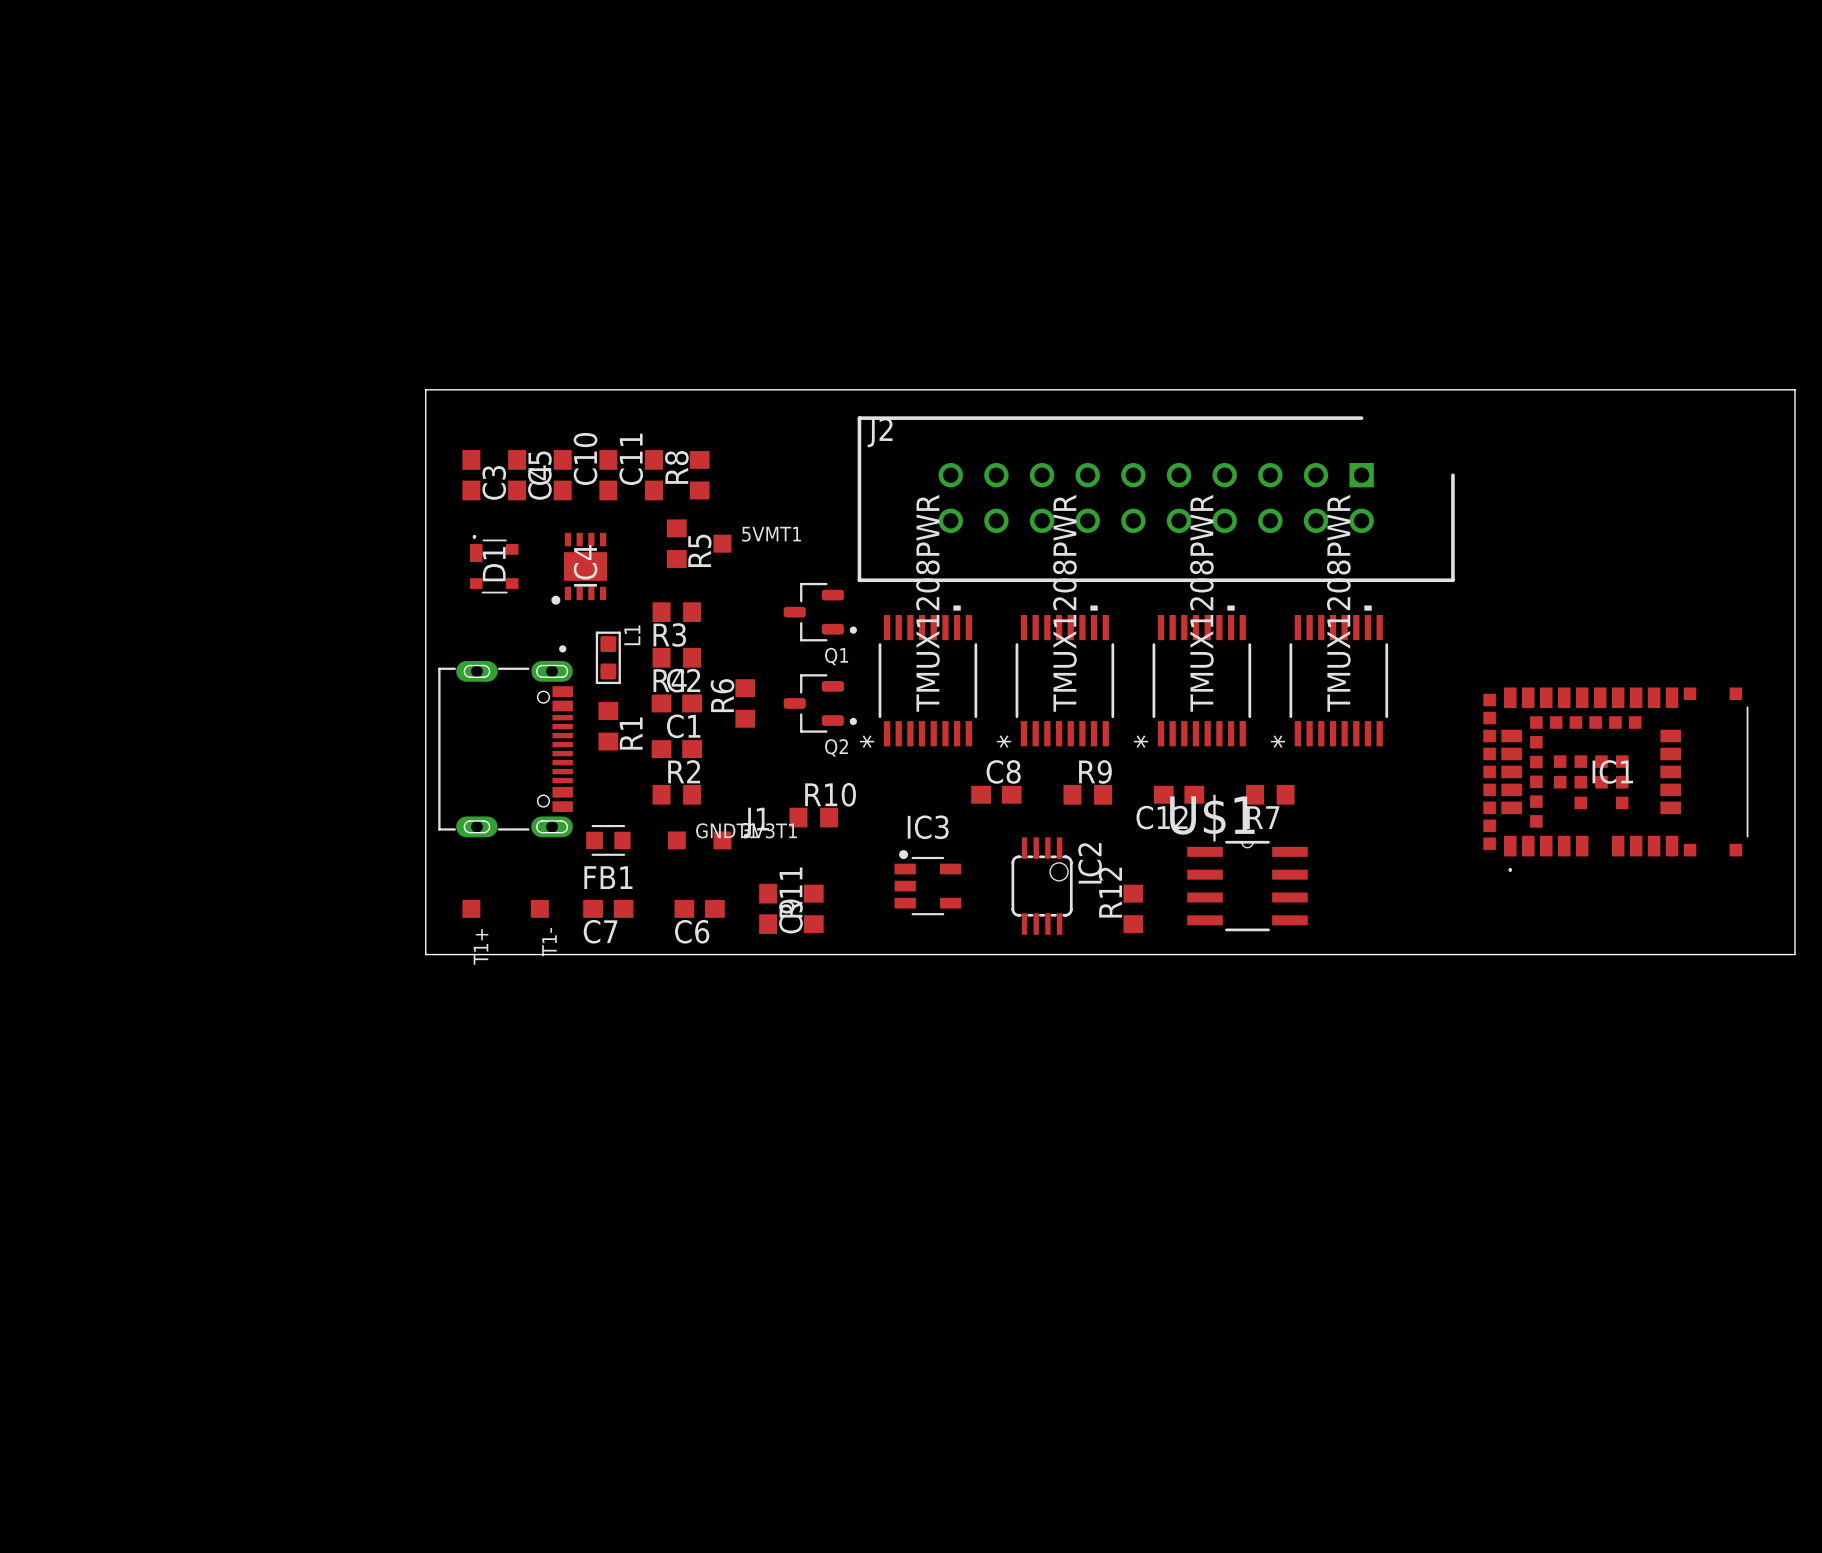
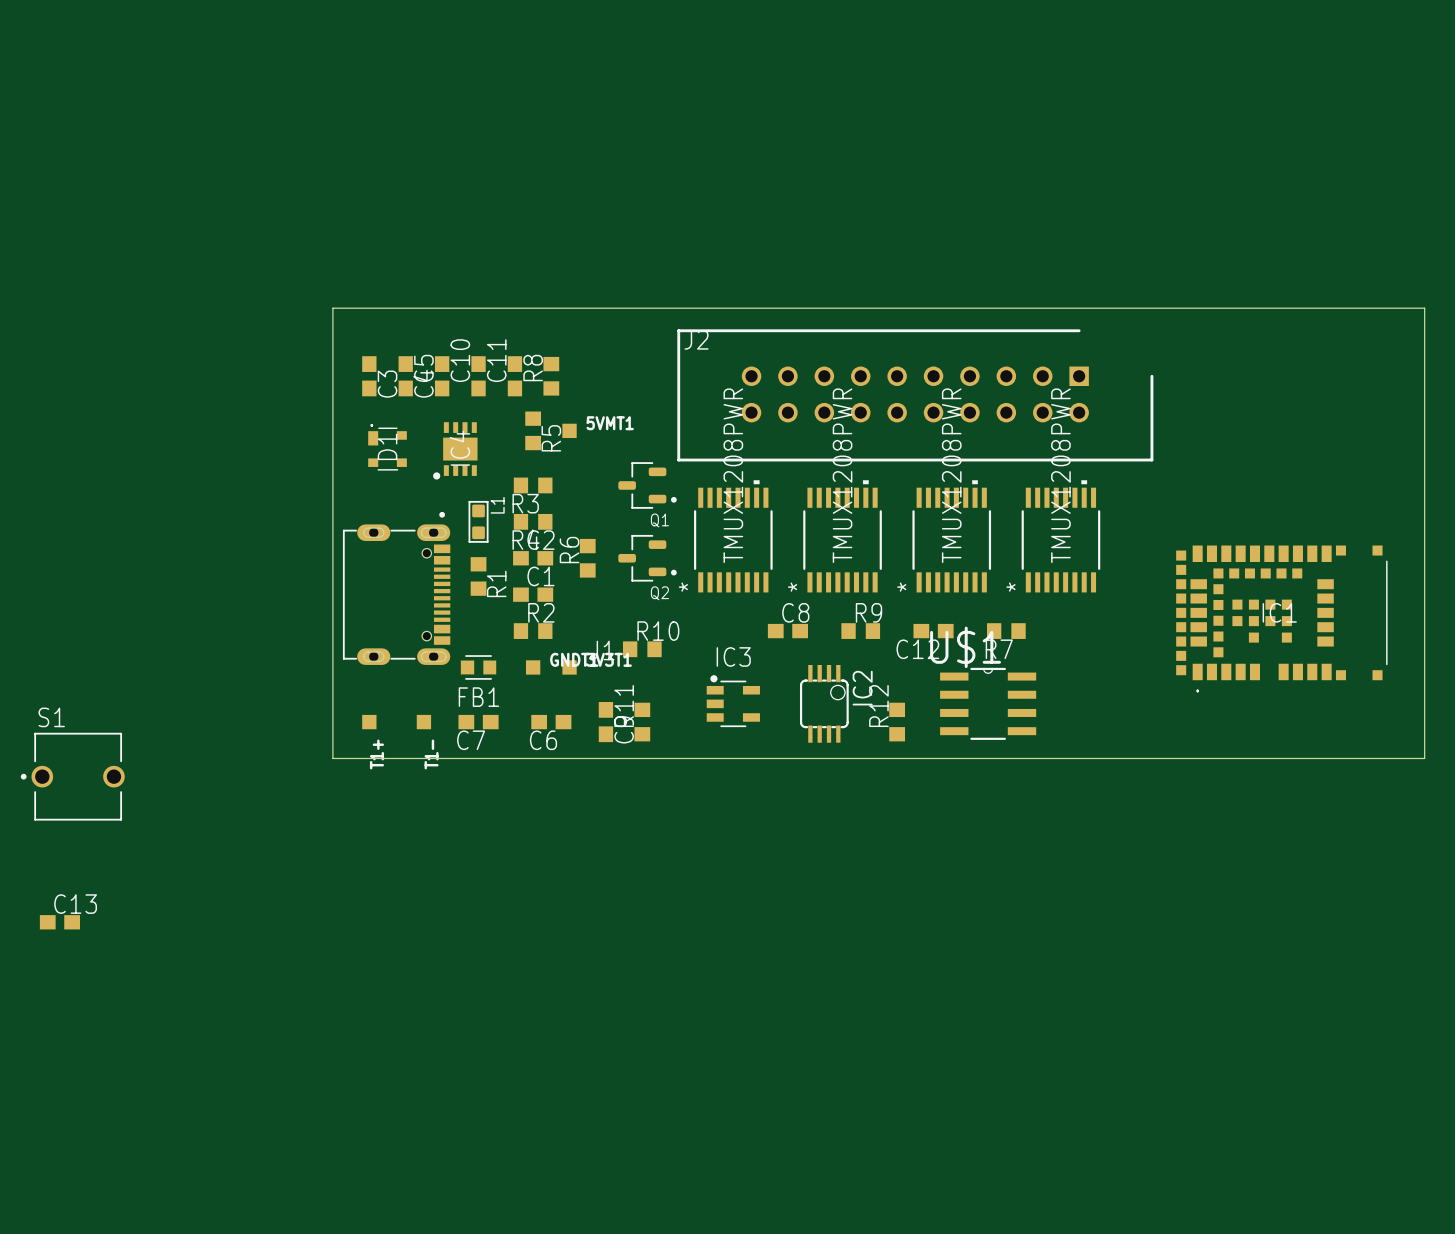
S1: none -> (72, 776)
C13: none -> (59, 922)

